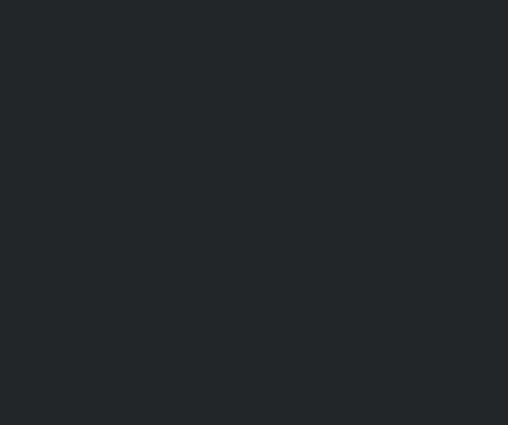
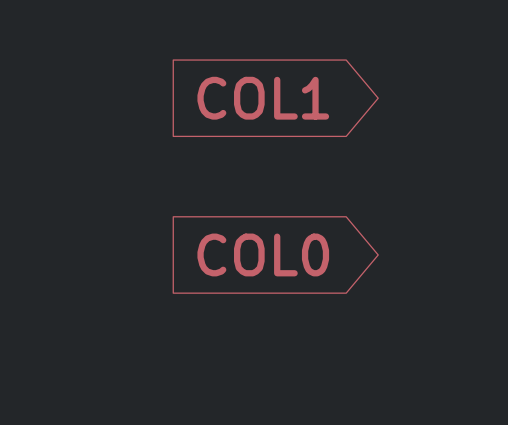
global label: none -> COL1 (263, 98)
global label: none -> COL0 (263, 254)

